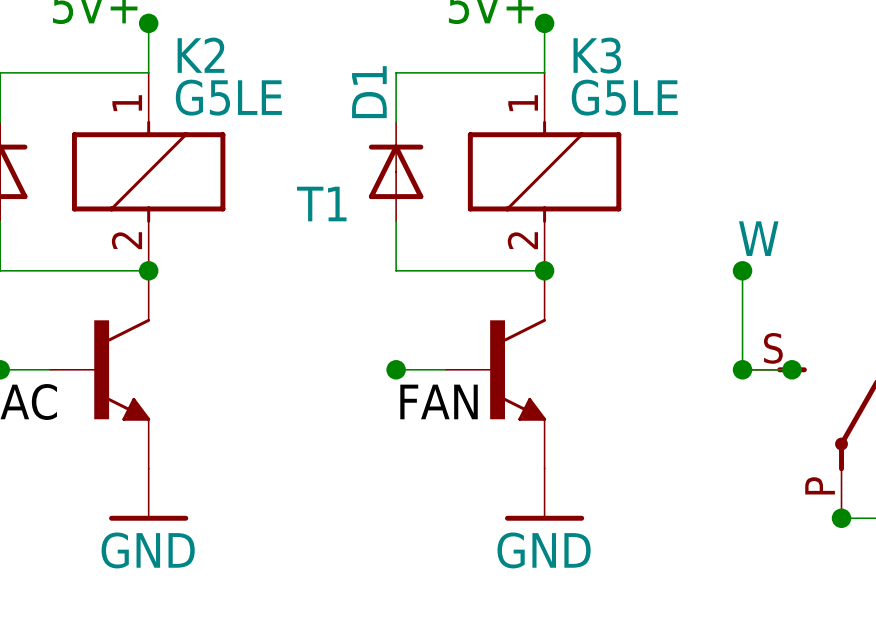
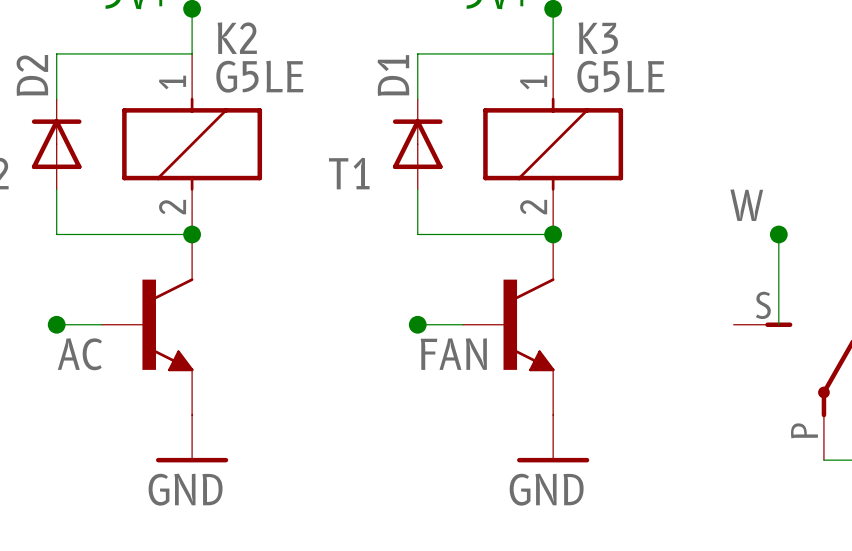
wire: (742, 270) (742, 369) (792, 369) -> (778, 234) (778, 324)
junction: (742, 270) -> none
junction: none -> (778, 234)
junction: (742, 369) -> none
junction: (792, 369) -> none
junction: (841, 518) -> none

